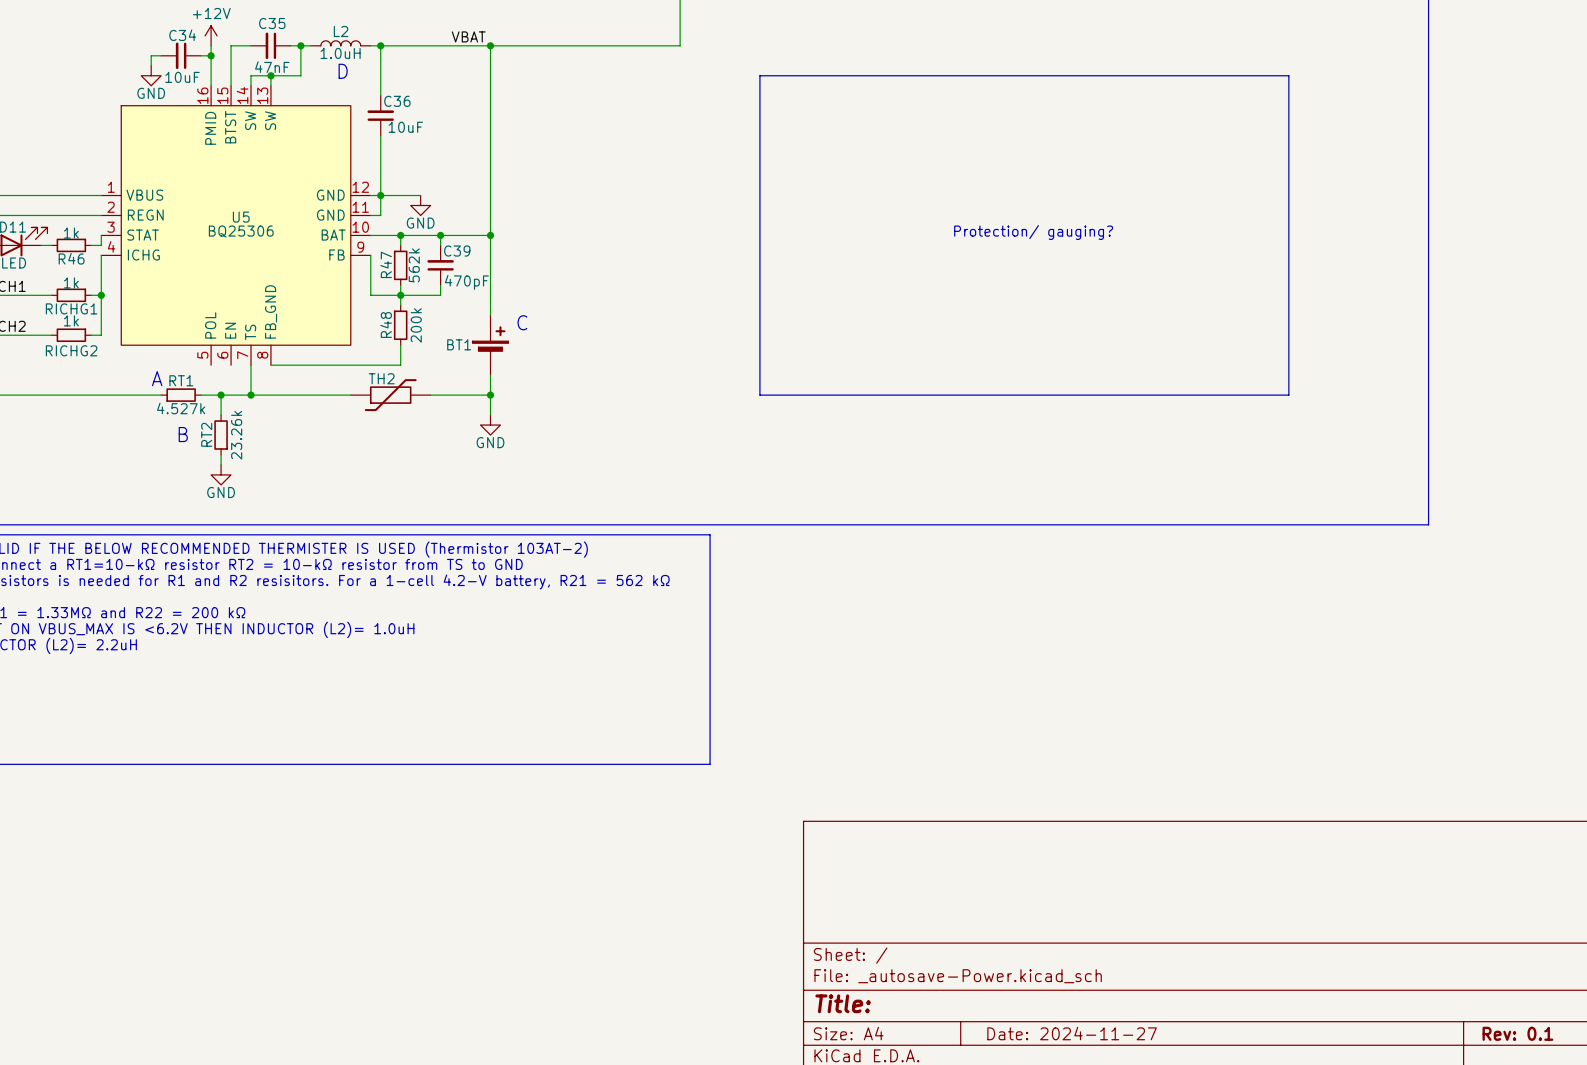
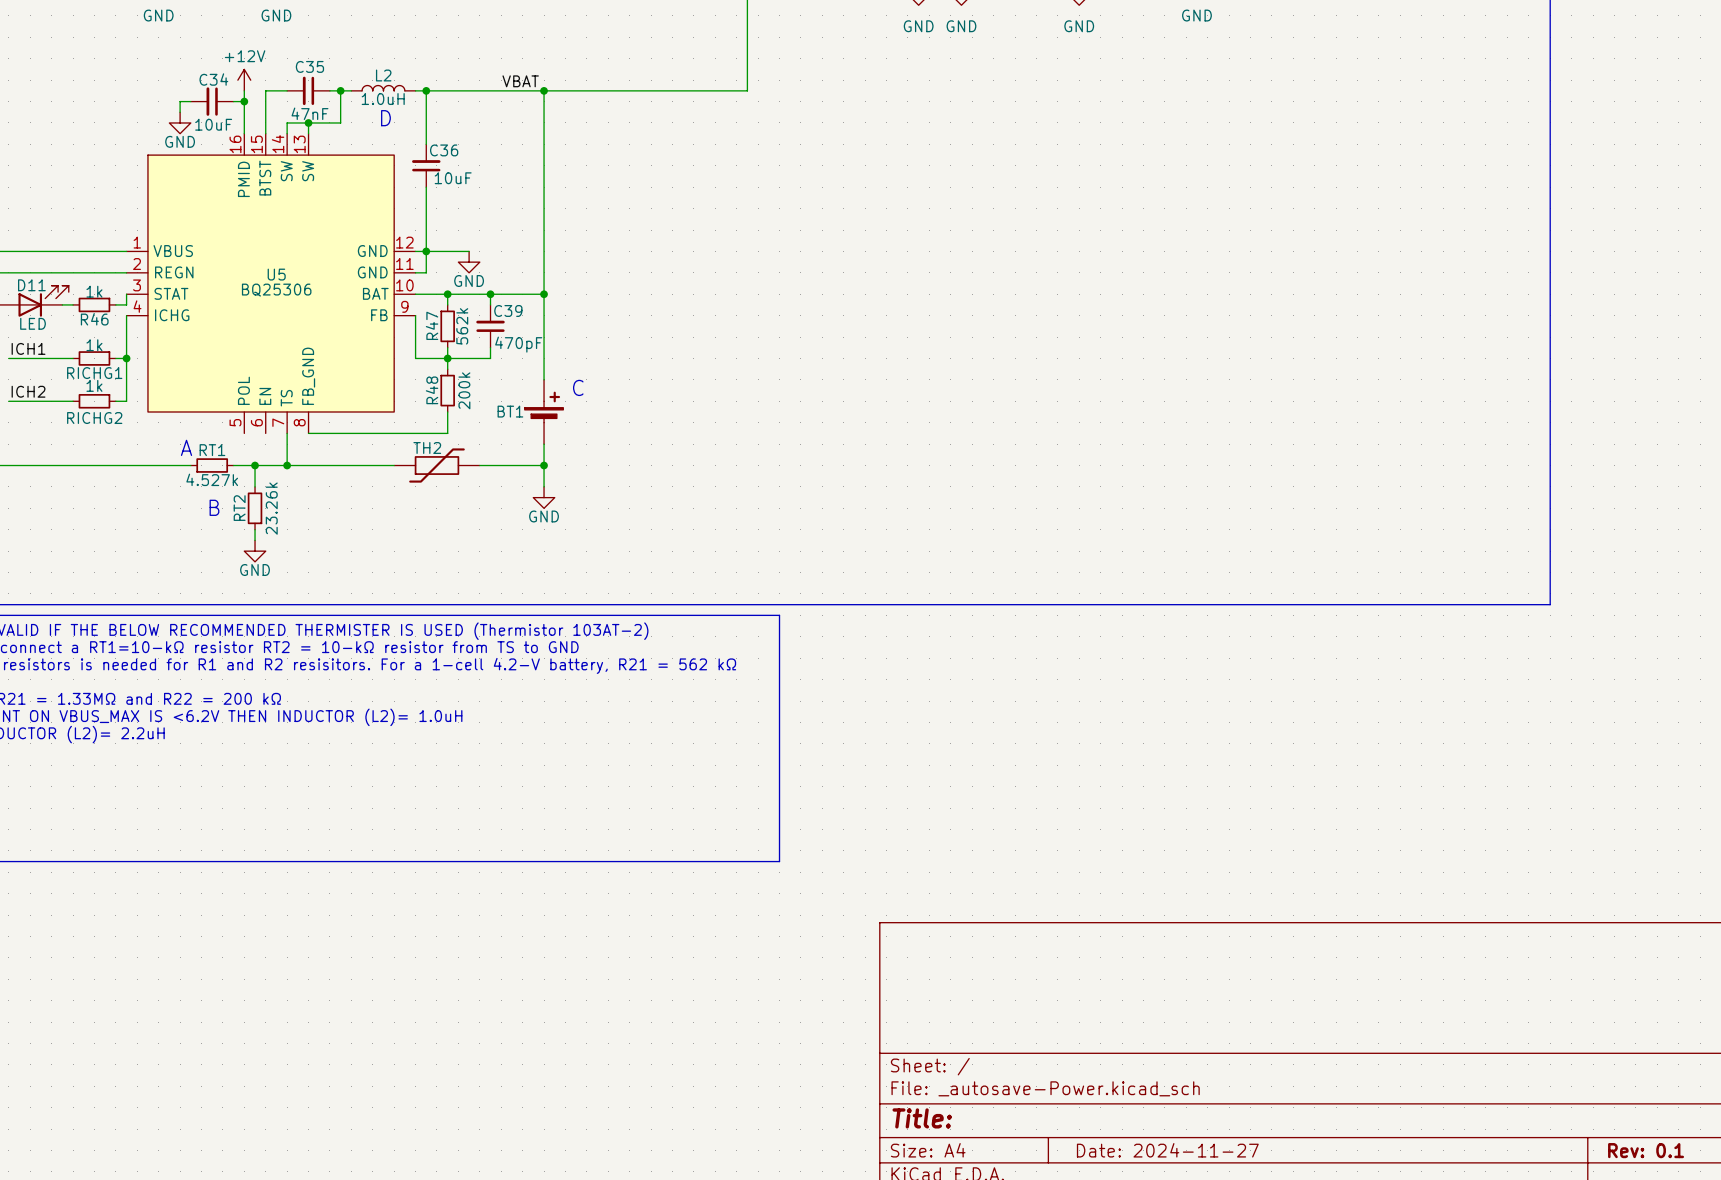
line: (759, 75) (1288, 75) (1288, 395) (759, 395) (759, 75) -> none
text: Protection/ gauging? (1033, 232) -> none

